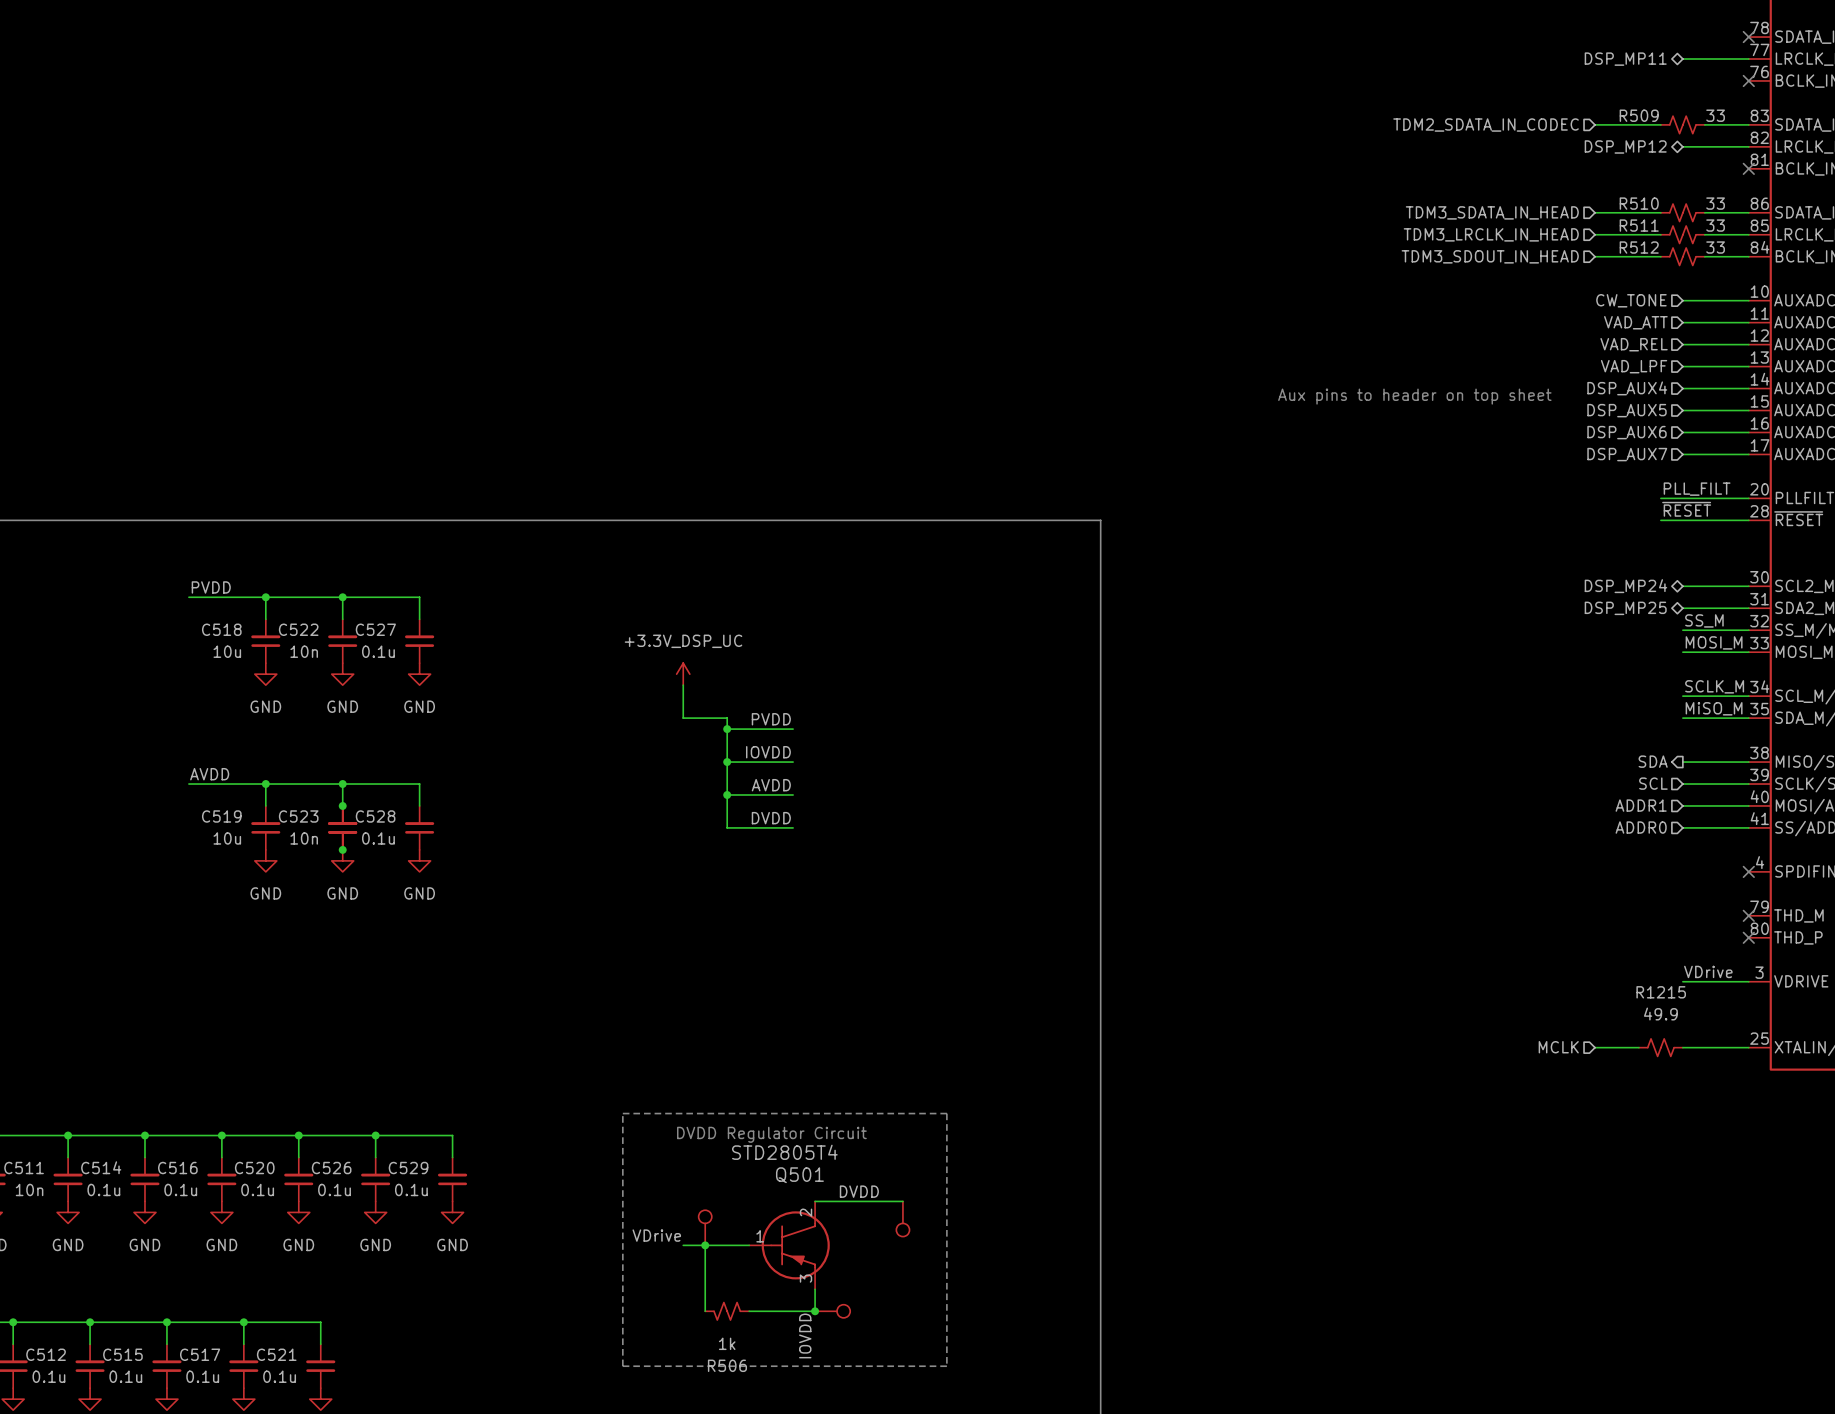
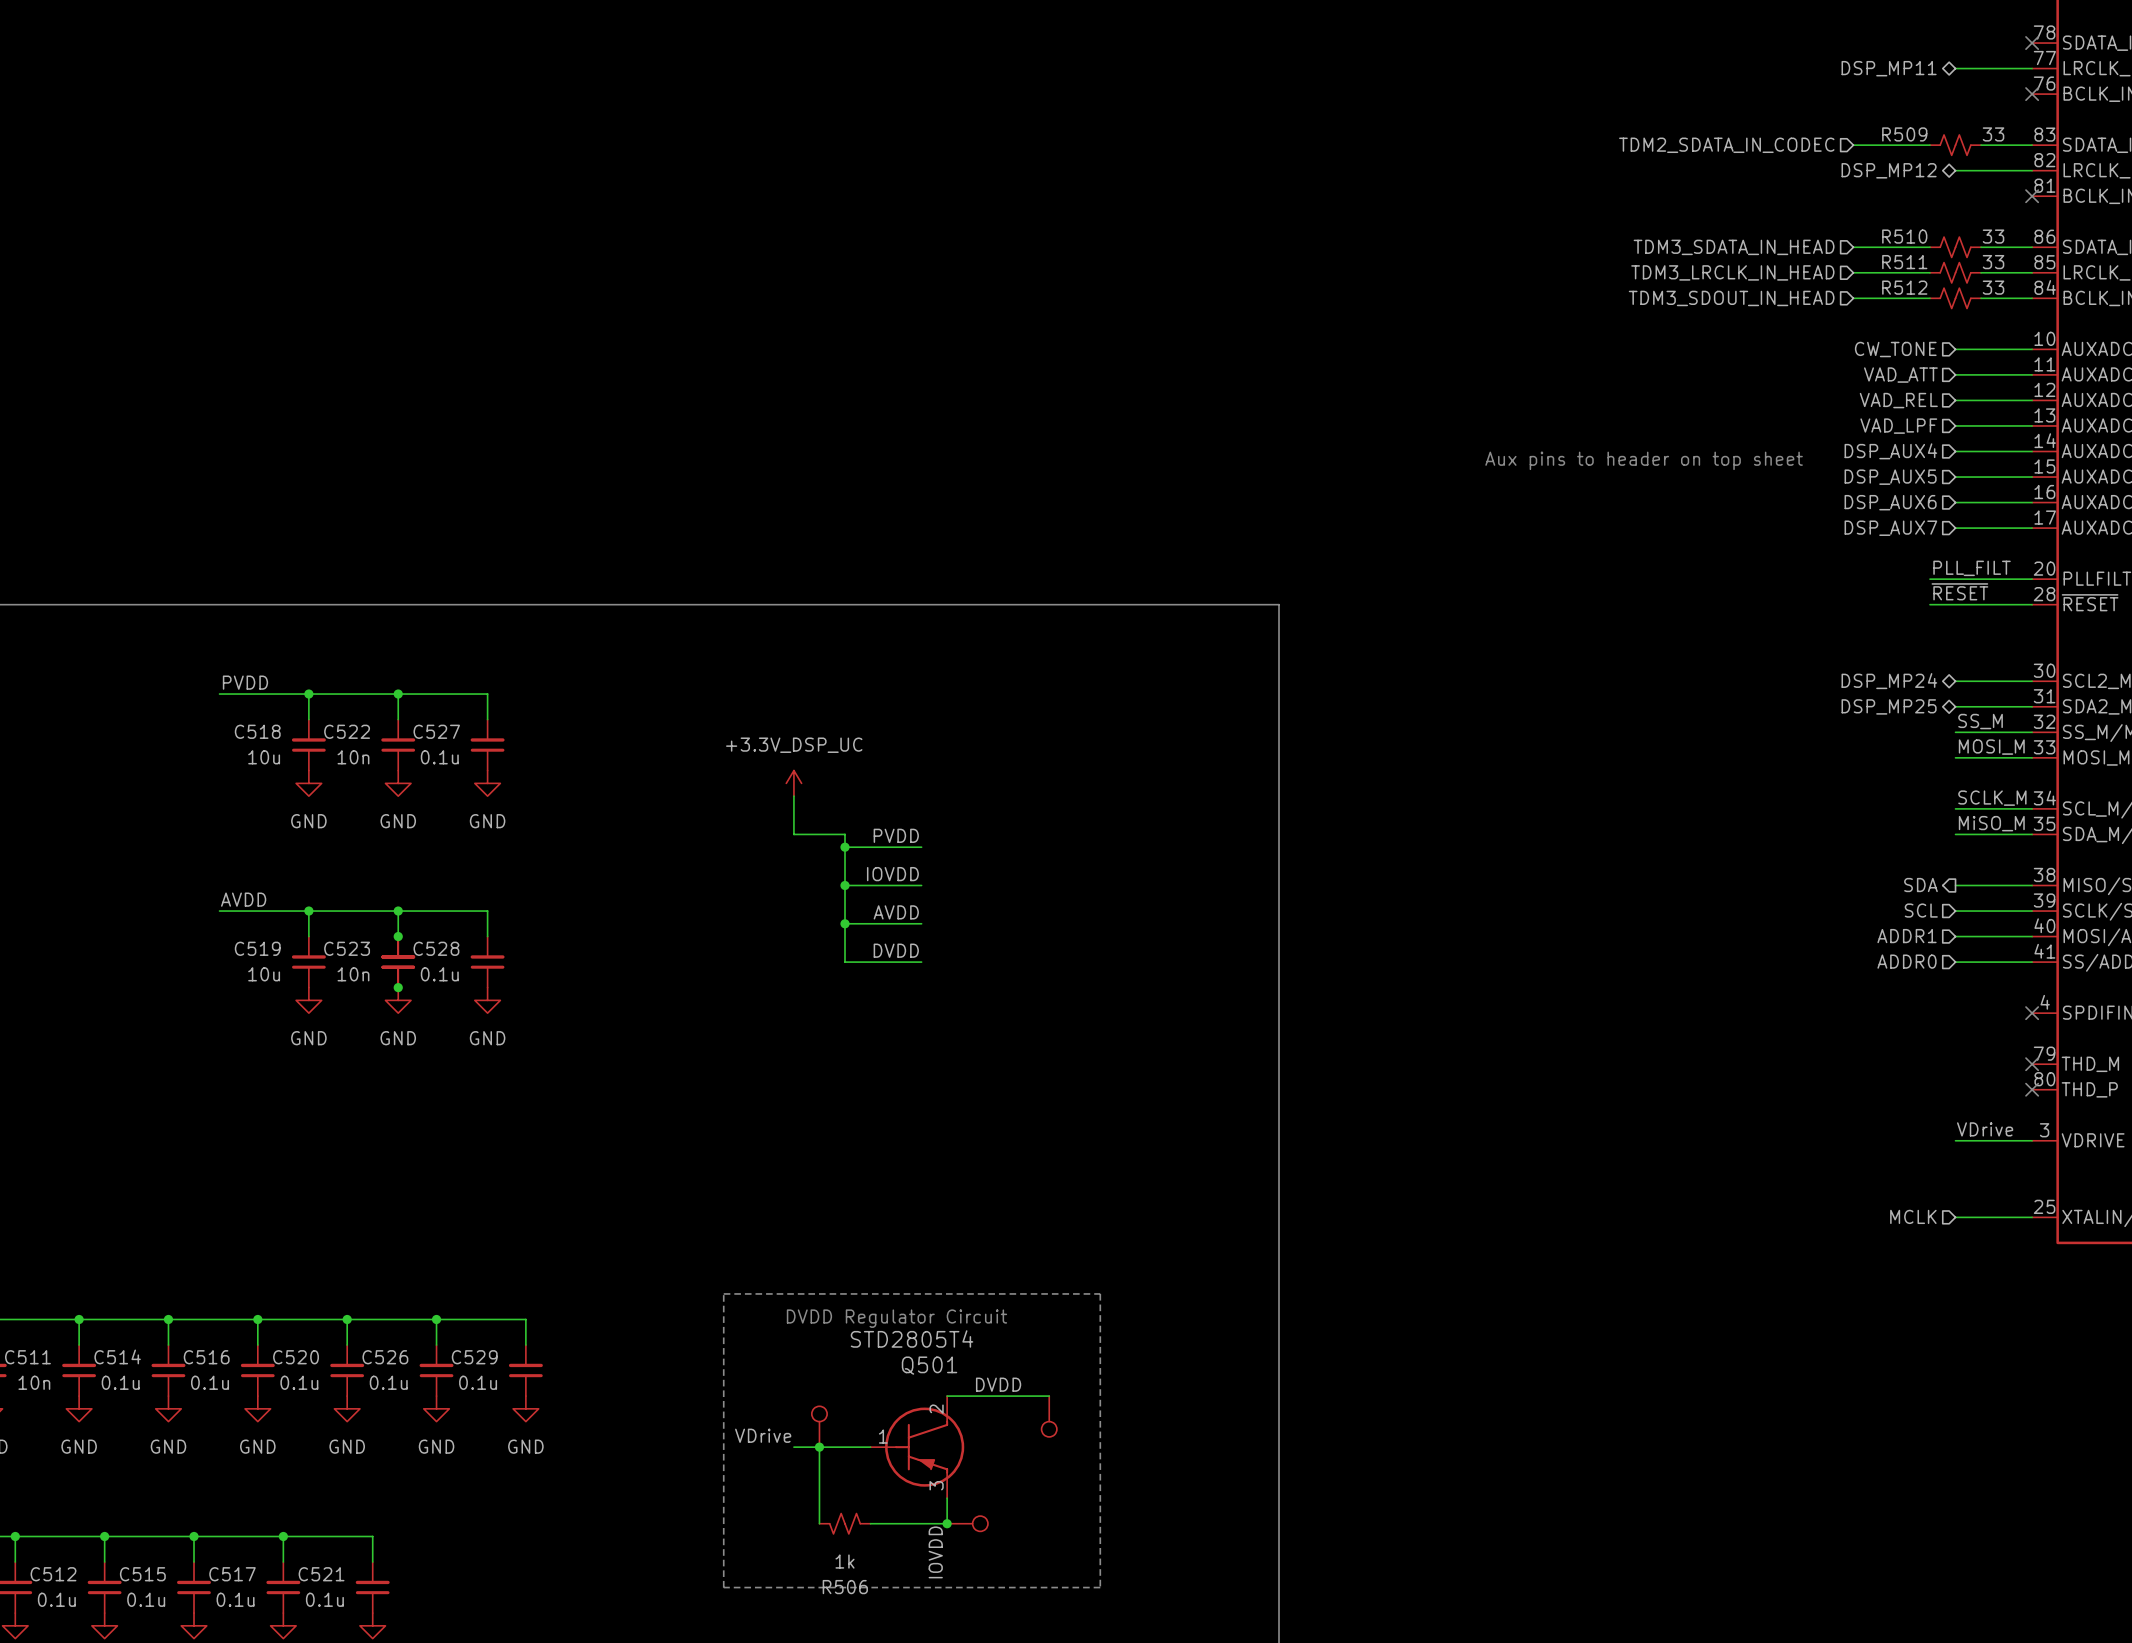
hierarchical label position: MCLK (1558, 1047) -> MCLK (1913, 1216)
wire: (1595, 1047) (1638, 1047) -> none
R1215: 49.9 (1660, 1047) -> none

